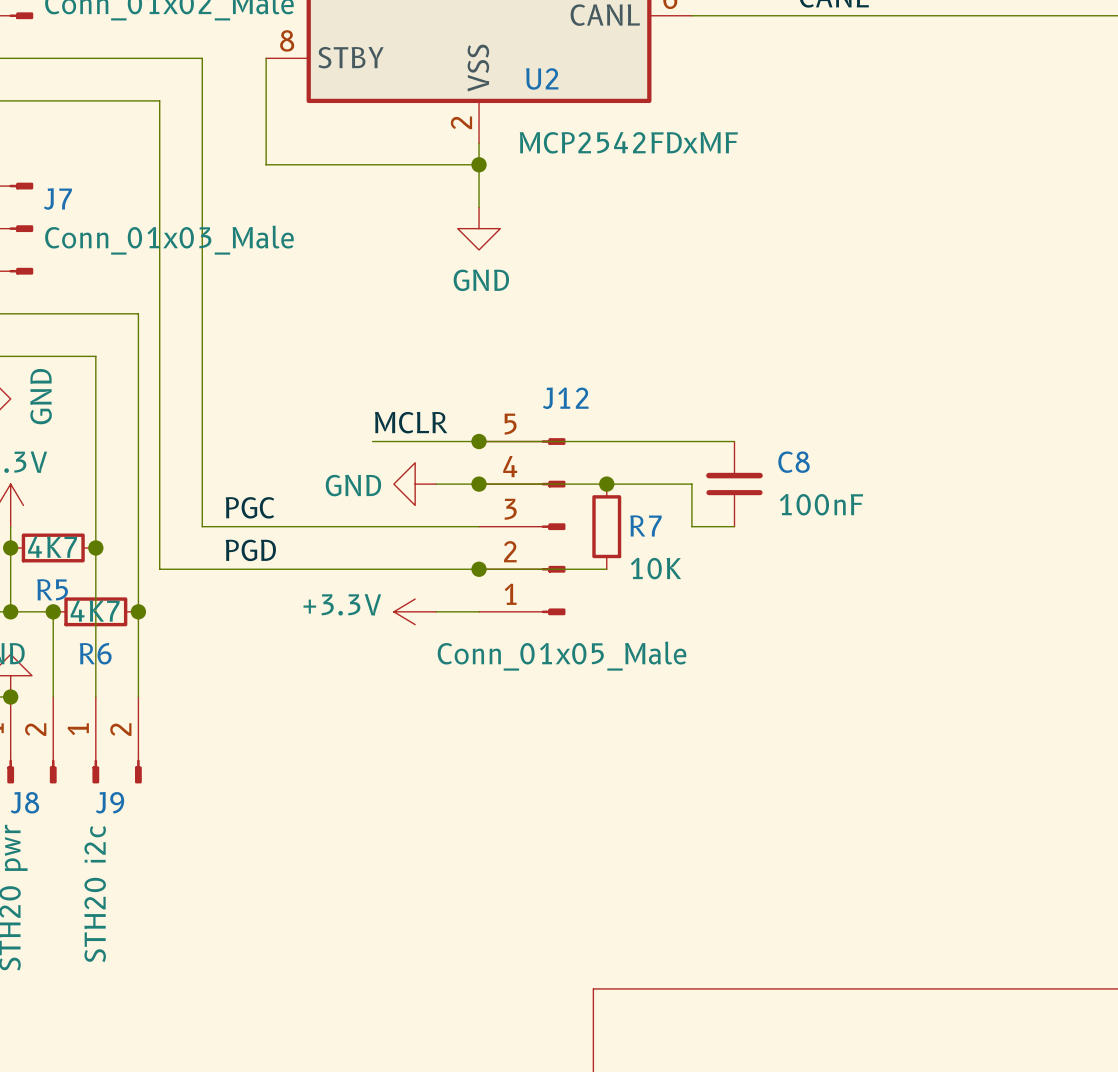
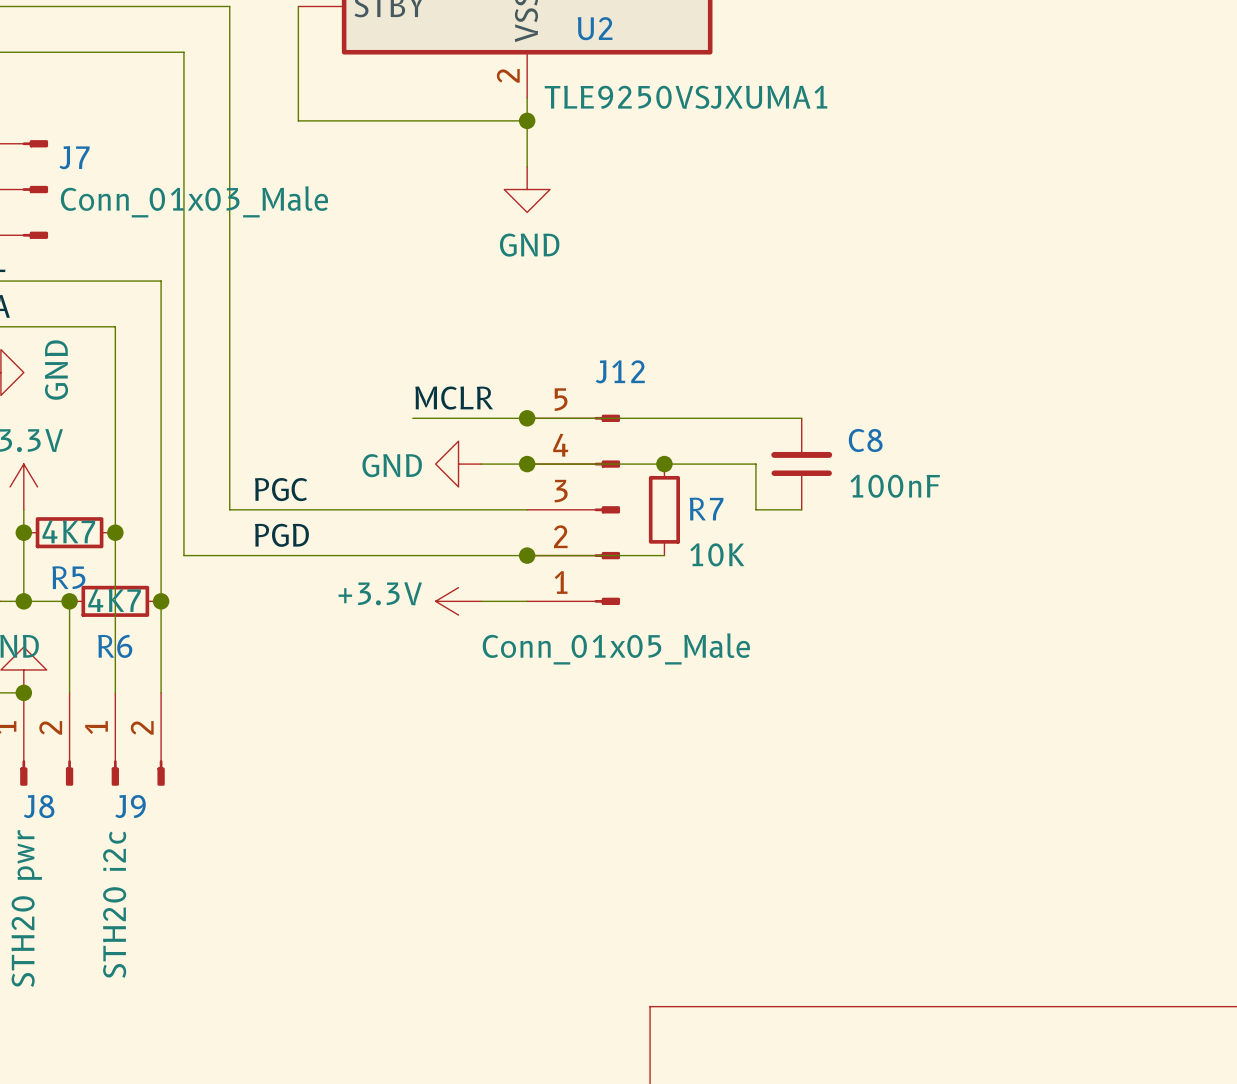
U2 value: MCP2542FDxMF (628, 142) -> TLE9250VSJXUMA1 (686, 97)

